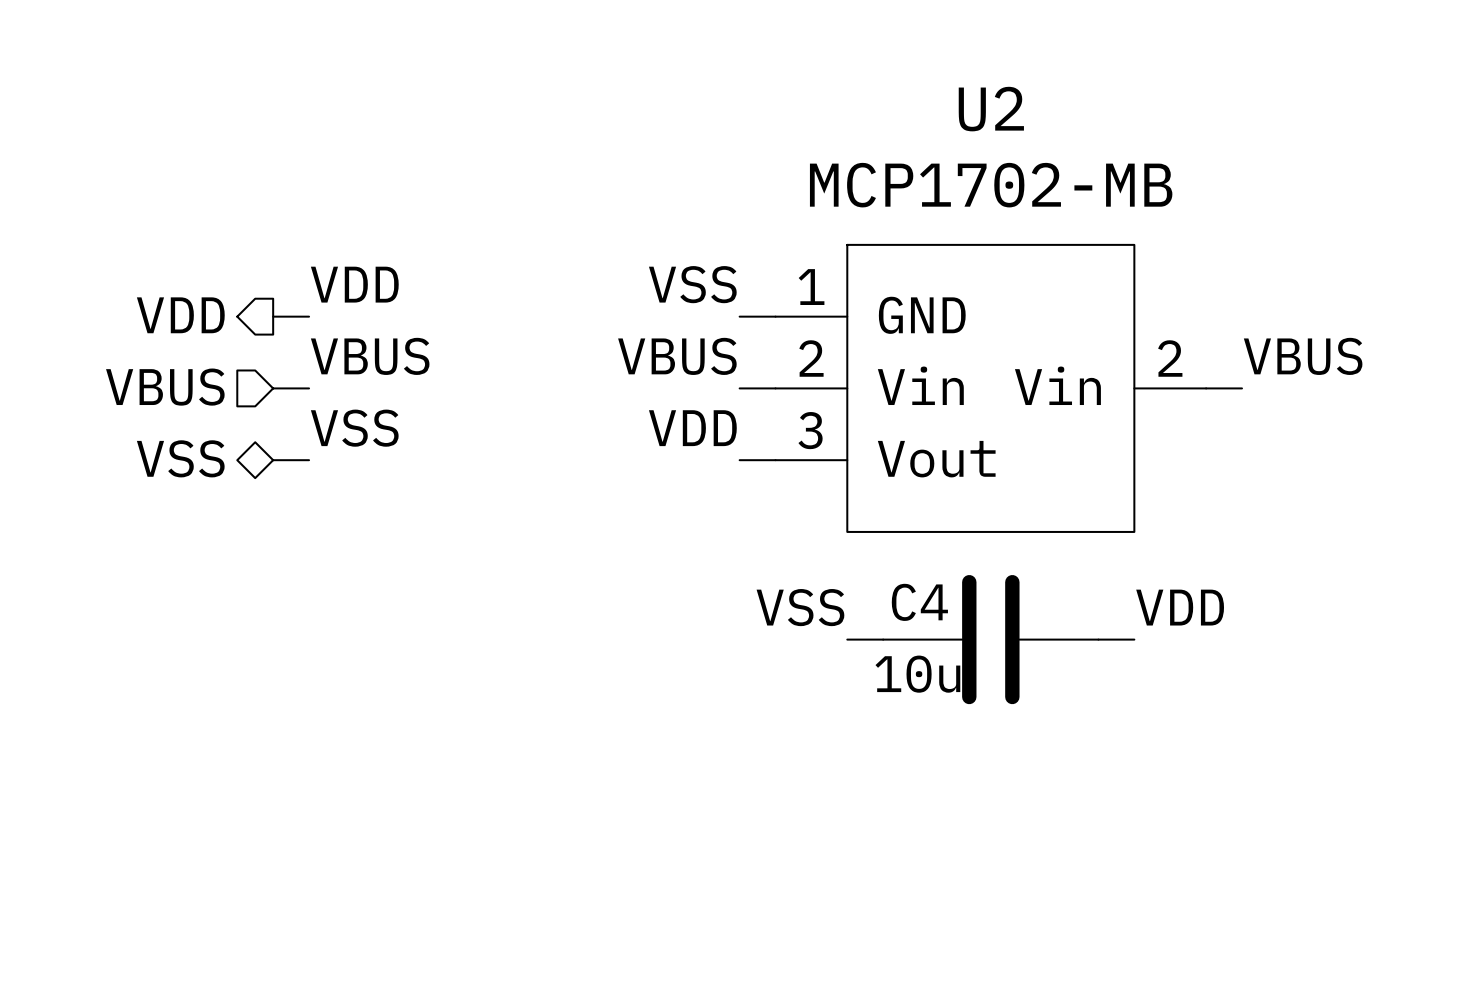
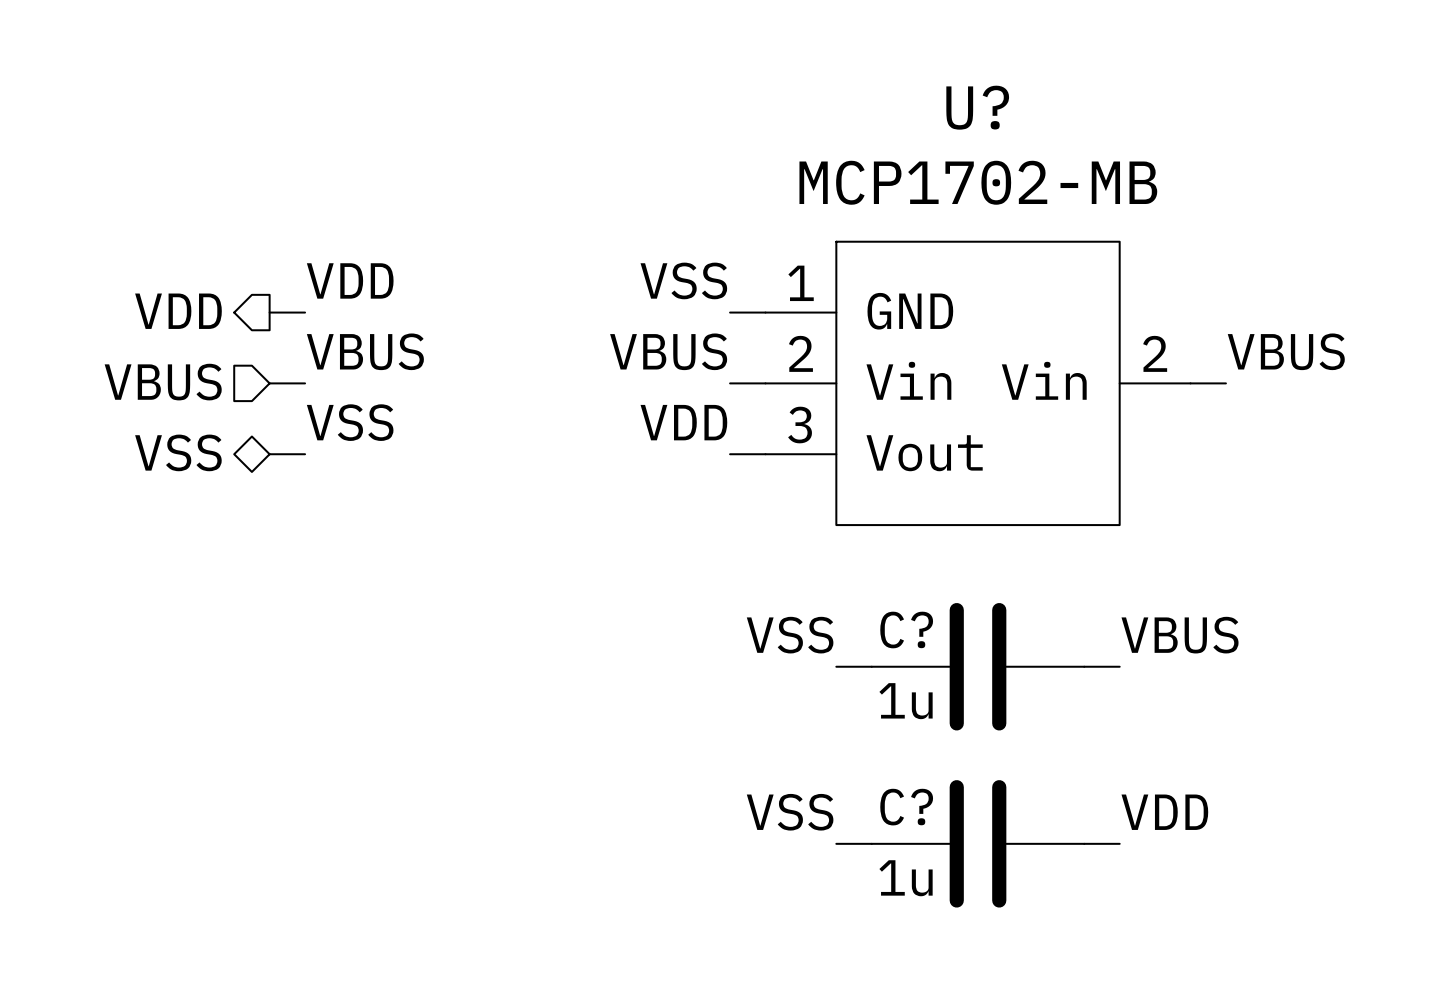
U2 name: U2 (991, 109) -> U? (977, 107)
label position: VSS (800, 607) -> VSS (790, 635)
label position: VDD (1180, 607) -> VDD (1164, 812)
wire: (847, 639) (883, 639) -> (836, 666) (871, 666)
C4: 10u (990, 639) -> none
wire: (1098, 639) (1134, 639) -> (1084, 666) (1119, 666)
label: none -> VBUS (1180, 635)
C?: none -> 1u (978, 666)
label: none -> VSS (790, 812)
wire: none -> (836, 843) (871, 843)
C?: none -> 1u (978, 843)
wire: none -> (1084, 843) (1119, 843)

